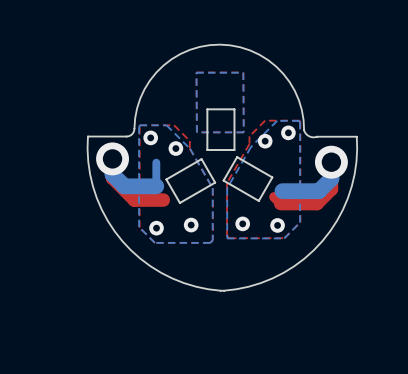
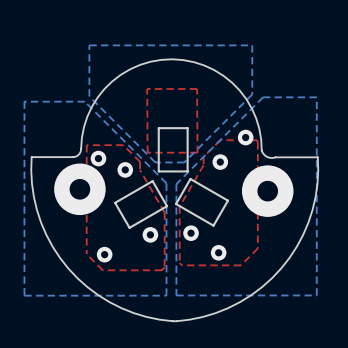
bottom zone outline: none -> (252, 45) (252, 94) (184, 162) (155, 162) (89, 96) (89, 45) (252, 45)
bottom zone outline: (243, 72) (243, 132) (196, 132) (196, 72) (243, 72) -> none
bottom zone outline: none -> (316, 97) (316, 295) (176, 295) (176, 184) (263, 97) (316, 97)
bottom zone outline: none -> (84, 101) (166, 183) (166, 295) (24, 295) (24, 101) (84, 101)
bottom zone outline: (299, 120) (277, 120) (251, 146) (227, 188) (227, 238) (284, 238) (300, 222) (299, 120) -> none
bottom zone outline: (166, 125) (139, 125) (139, 127) (139, 226) (154, 242) (210, 242) (212, 240) (212, 187) (190, 148) (166, 125) -> none
via position: (288, 132) -> (245, 137)
top track: (112, 158) (112, 177) (134, 200) (163, 200) -> none
bottom track: (112, 158) (112, 174) (124, 186) (156, 186) (156, 162) -> none
via: (112, 158) -> none
top track: (331, 162) (331, 189) (316, 203) (280, 203) (274, 196) -> none
bottom track: (331, 162) (331, 178) (318, 191) (282, 191) -> none
via: (331, 162) -> none
via: none -> (79, 189)
via: none -> (267, 191)
via: none -> (191, 233)
via: (242, 223) -> none
via position: (191, 225) -> (150, 234)
via position: (277, 225) -> (218, 252)

